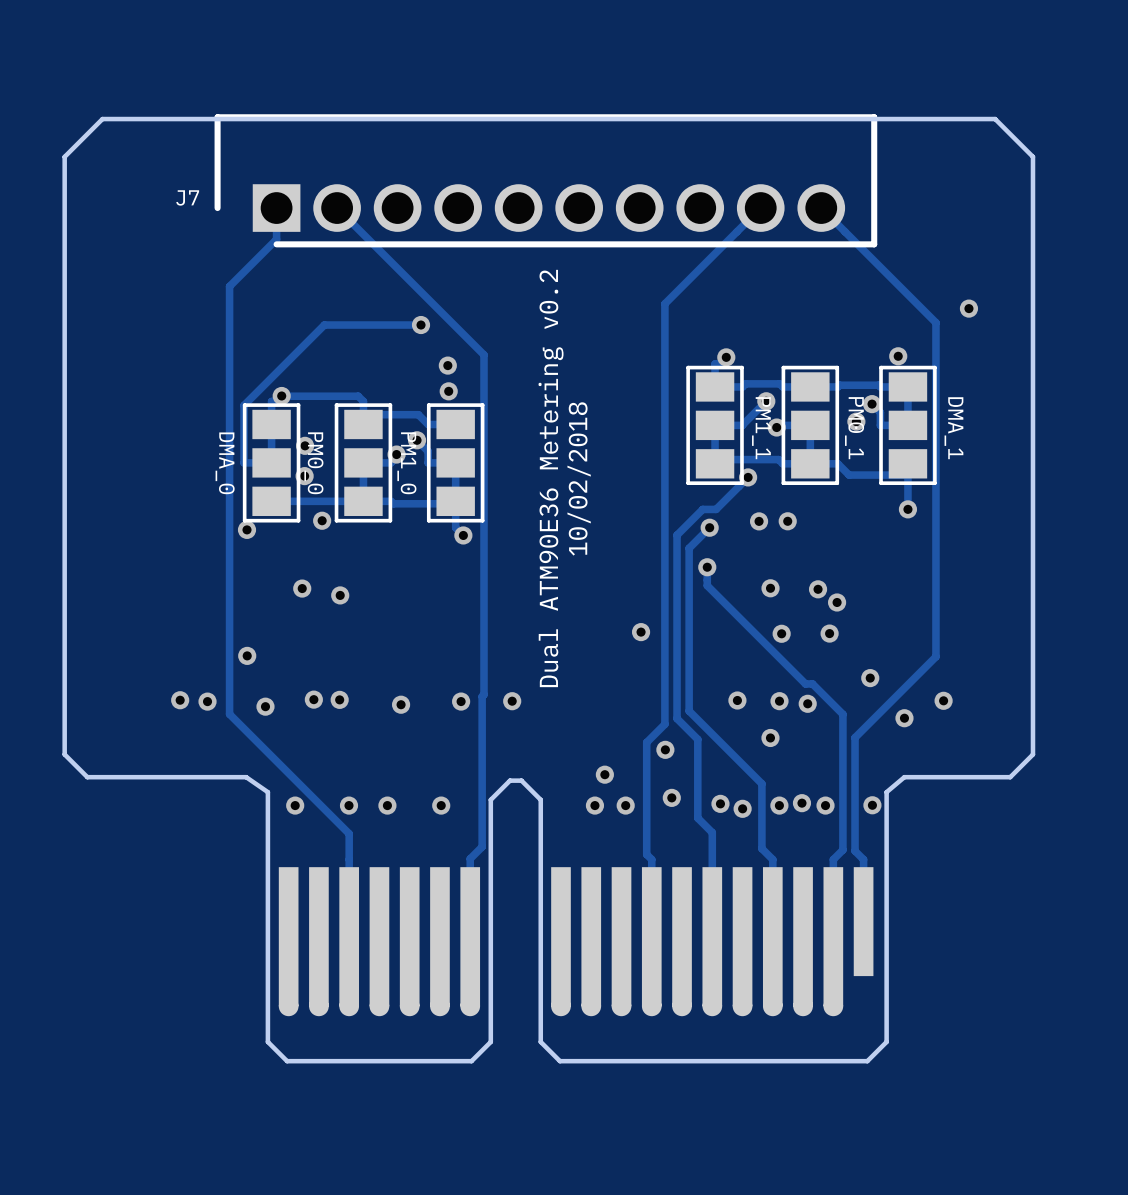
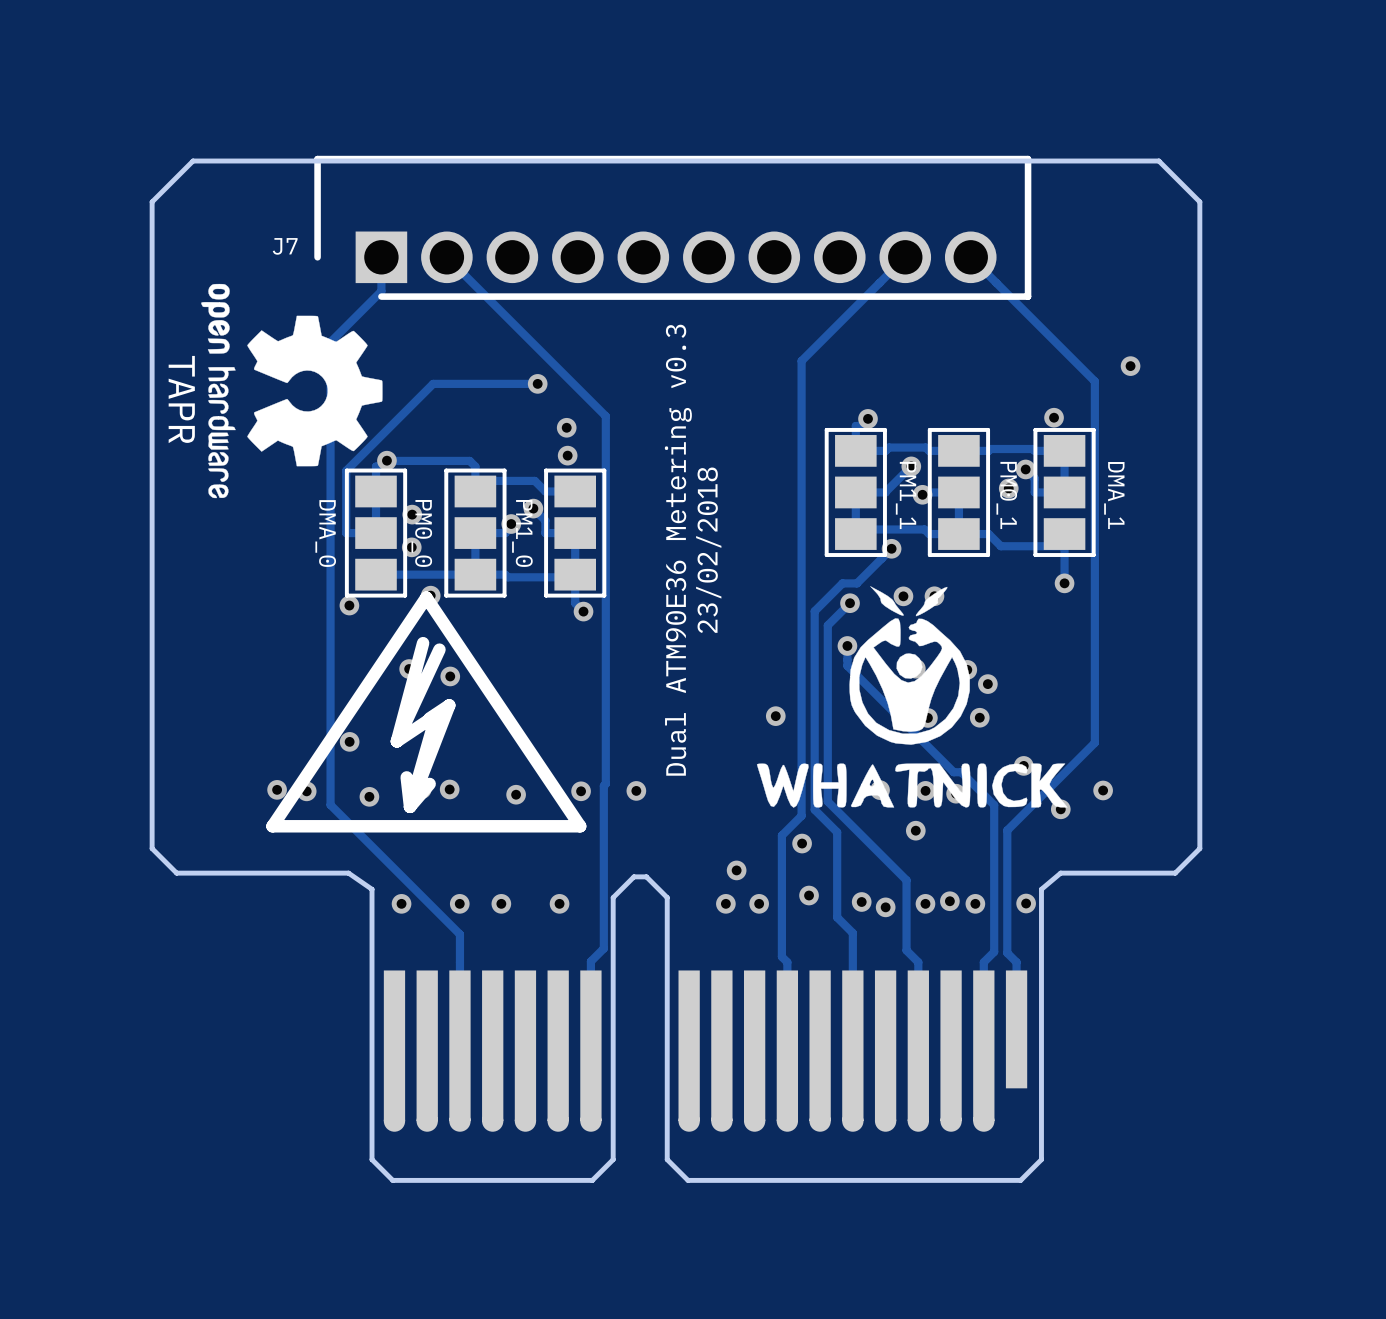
drawing: none -> [201, 283, 383, 499]
text: none -> TAPR (181, 399)
text: Dual ATM90E36 Metering v0.2 (551, 478) -> Dual ATM90E36 Metering v0.3 (678, 550)
text: 10/02/2018 (579, 478) -> 23/02/2018 (708, 550)
drawing: none -> [756, 586, 1068, 808]
drawing: none -> [266, 591, 587, 833]

